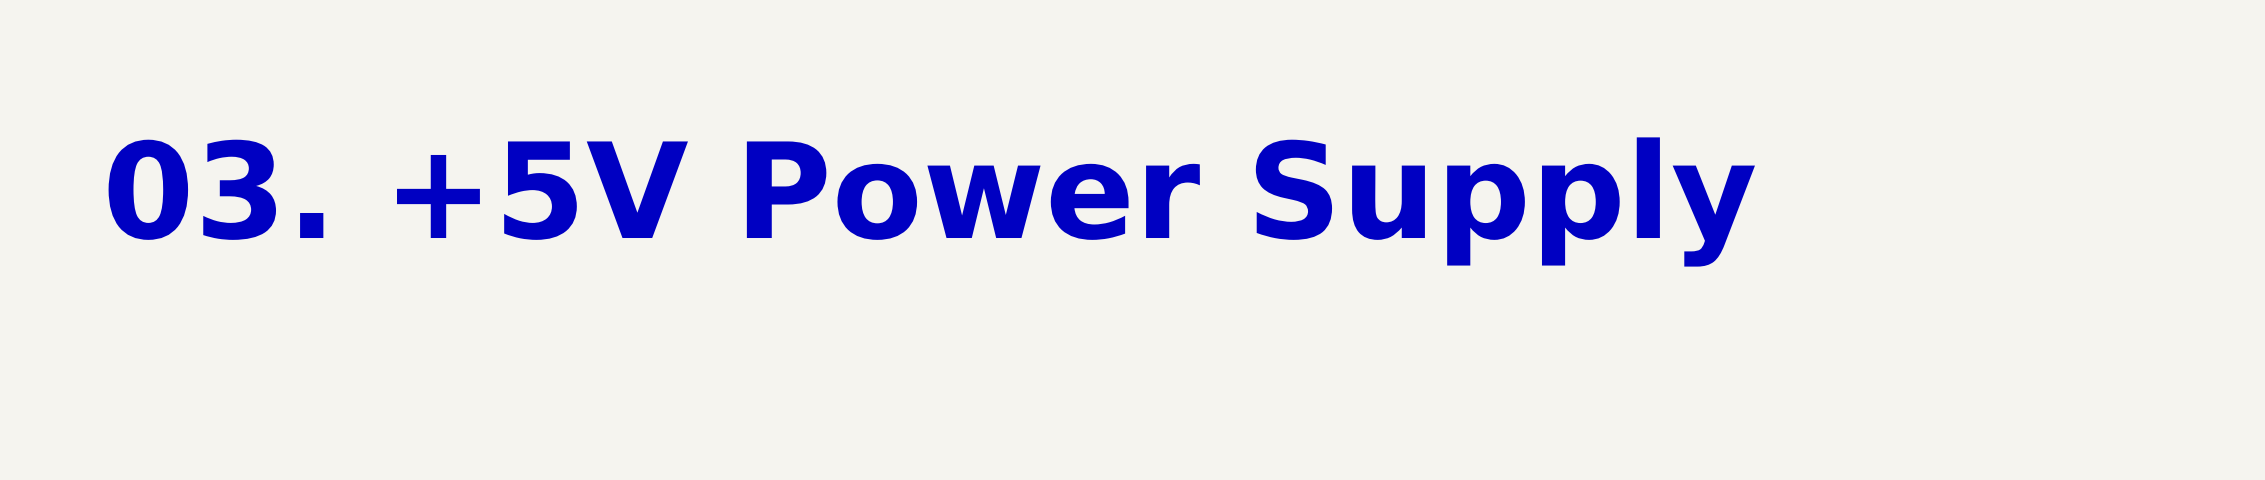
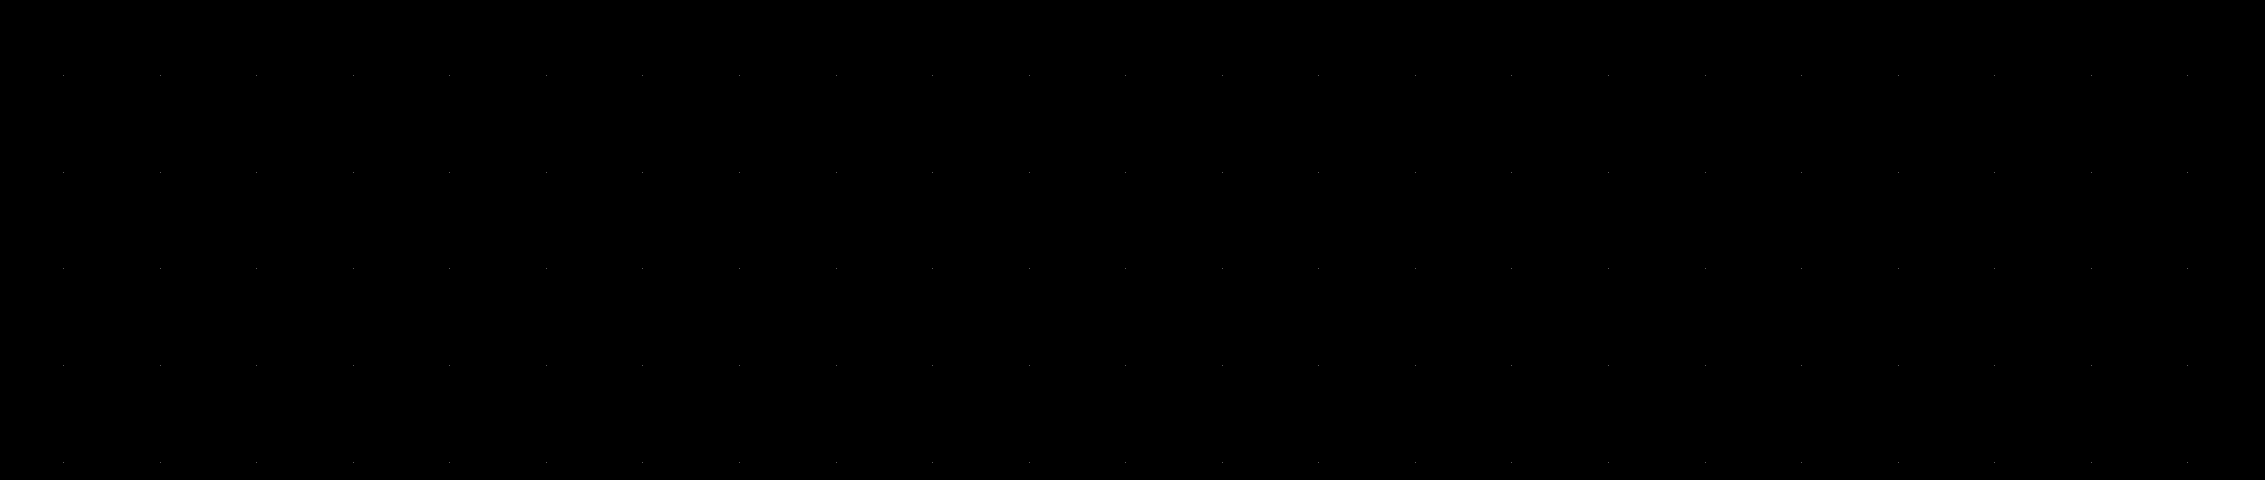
text: 03. +5V Power Supply (931, 201) -> none

